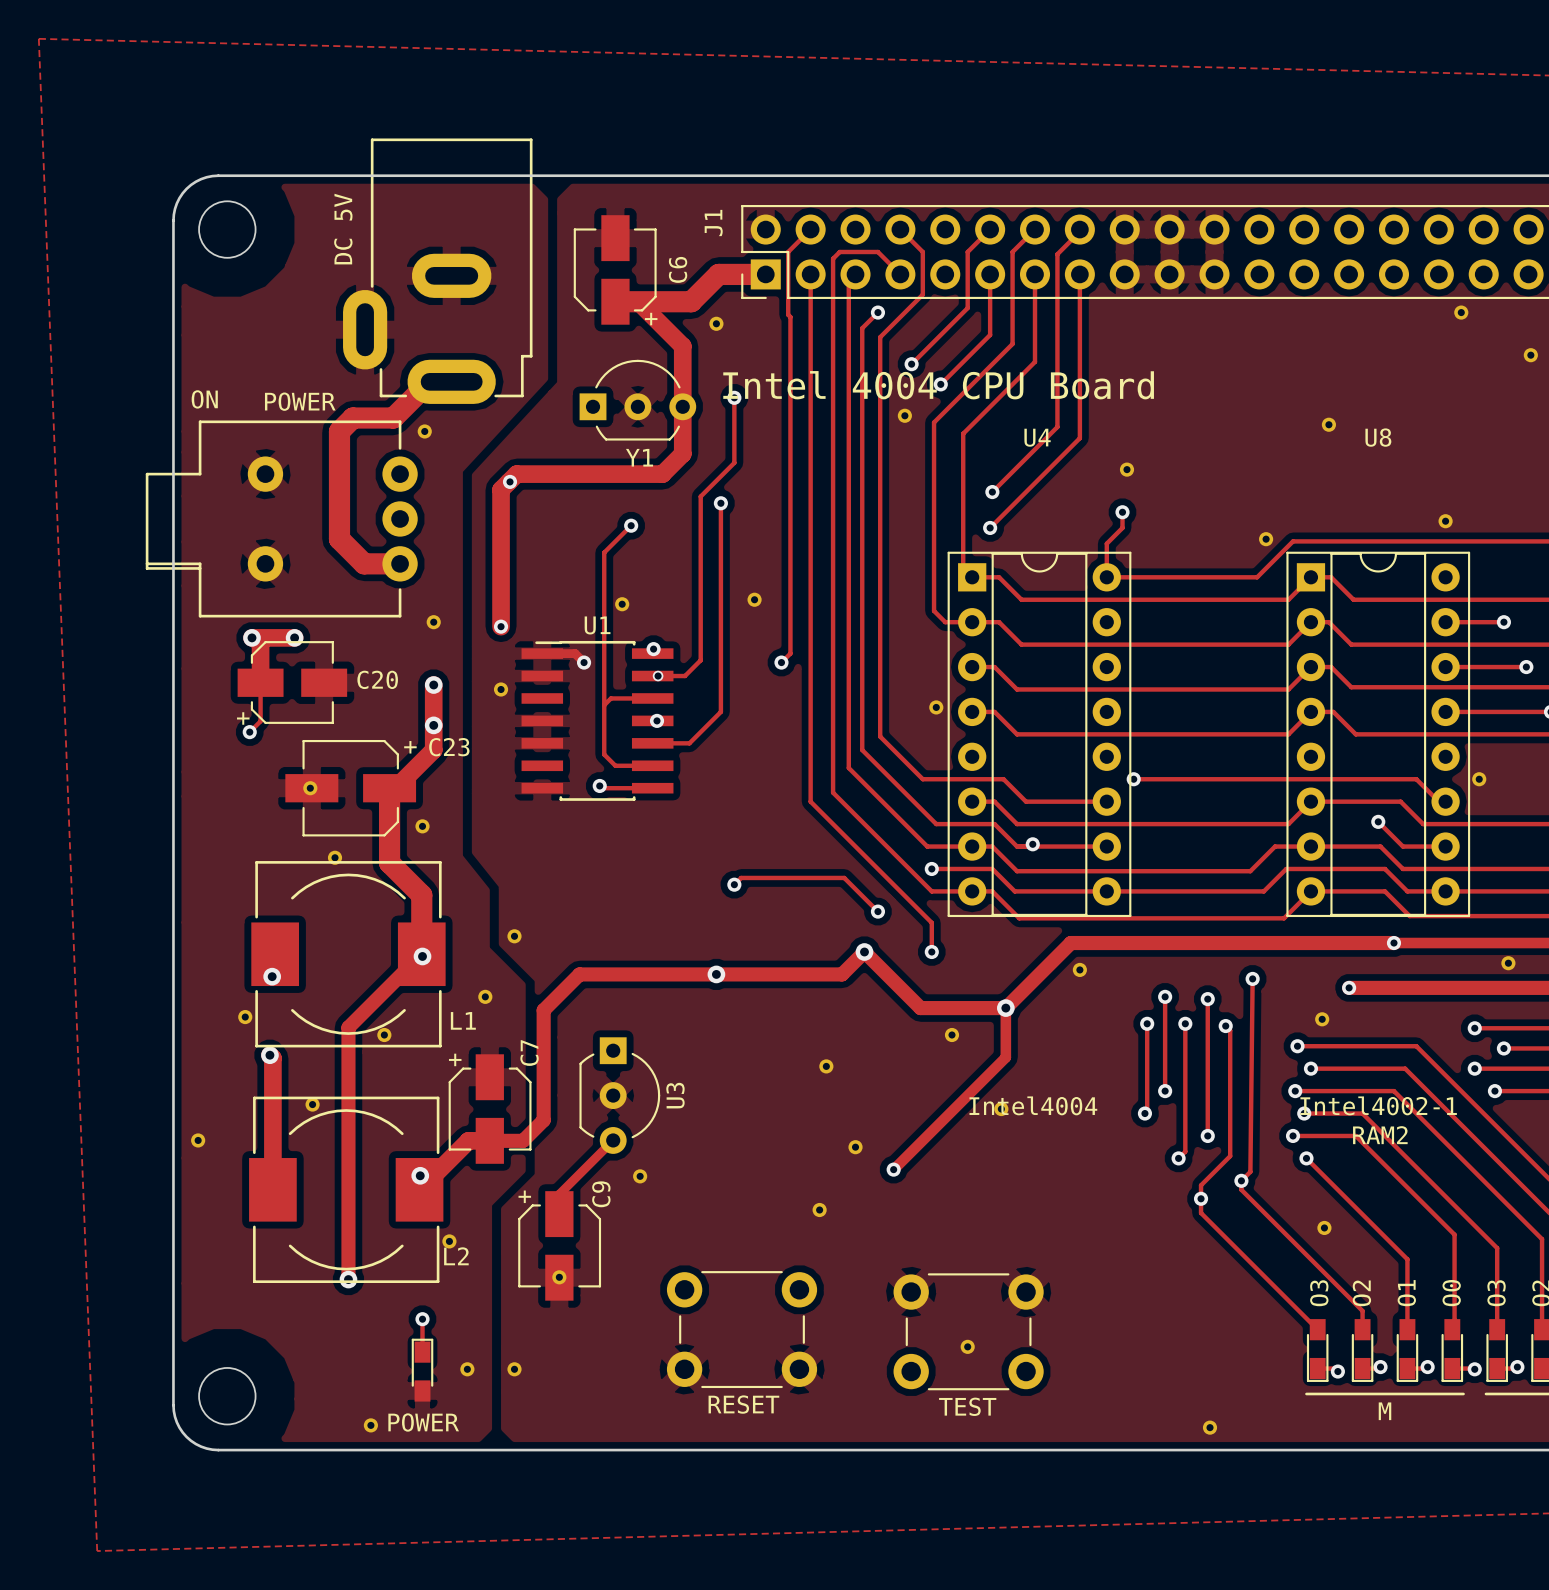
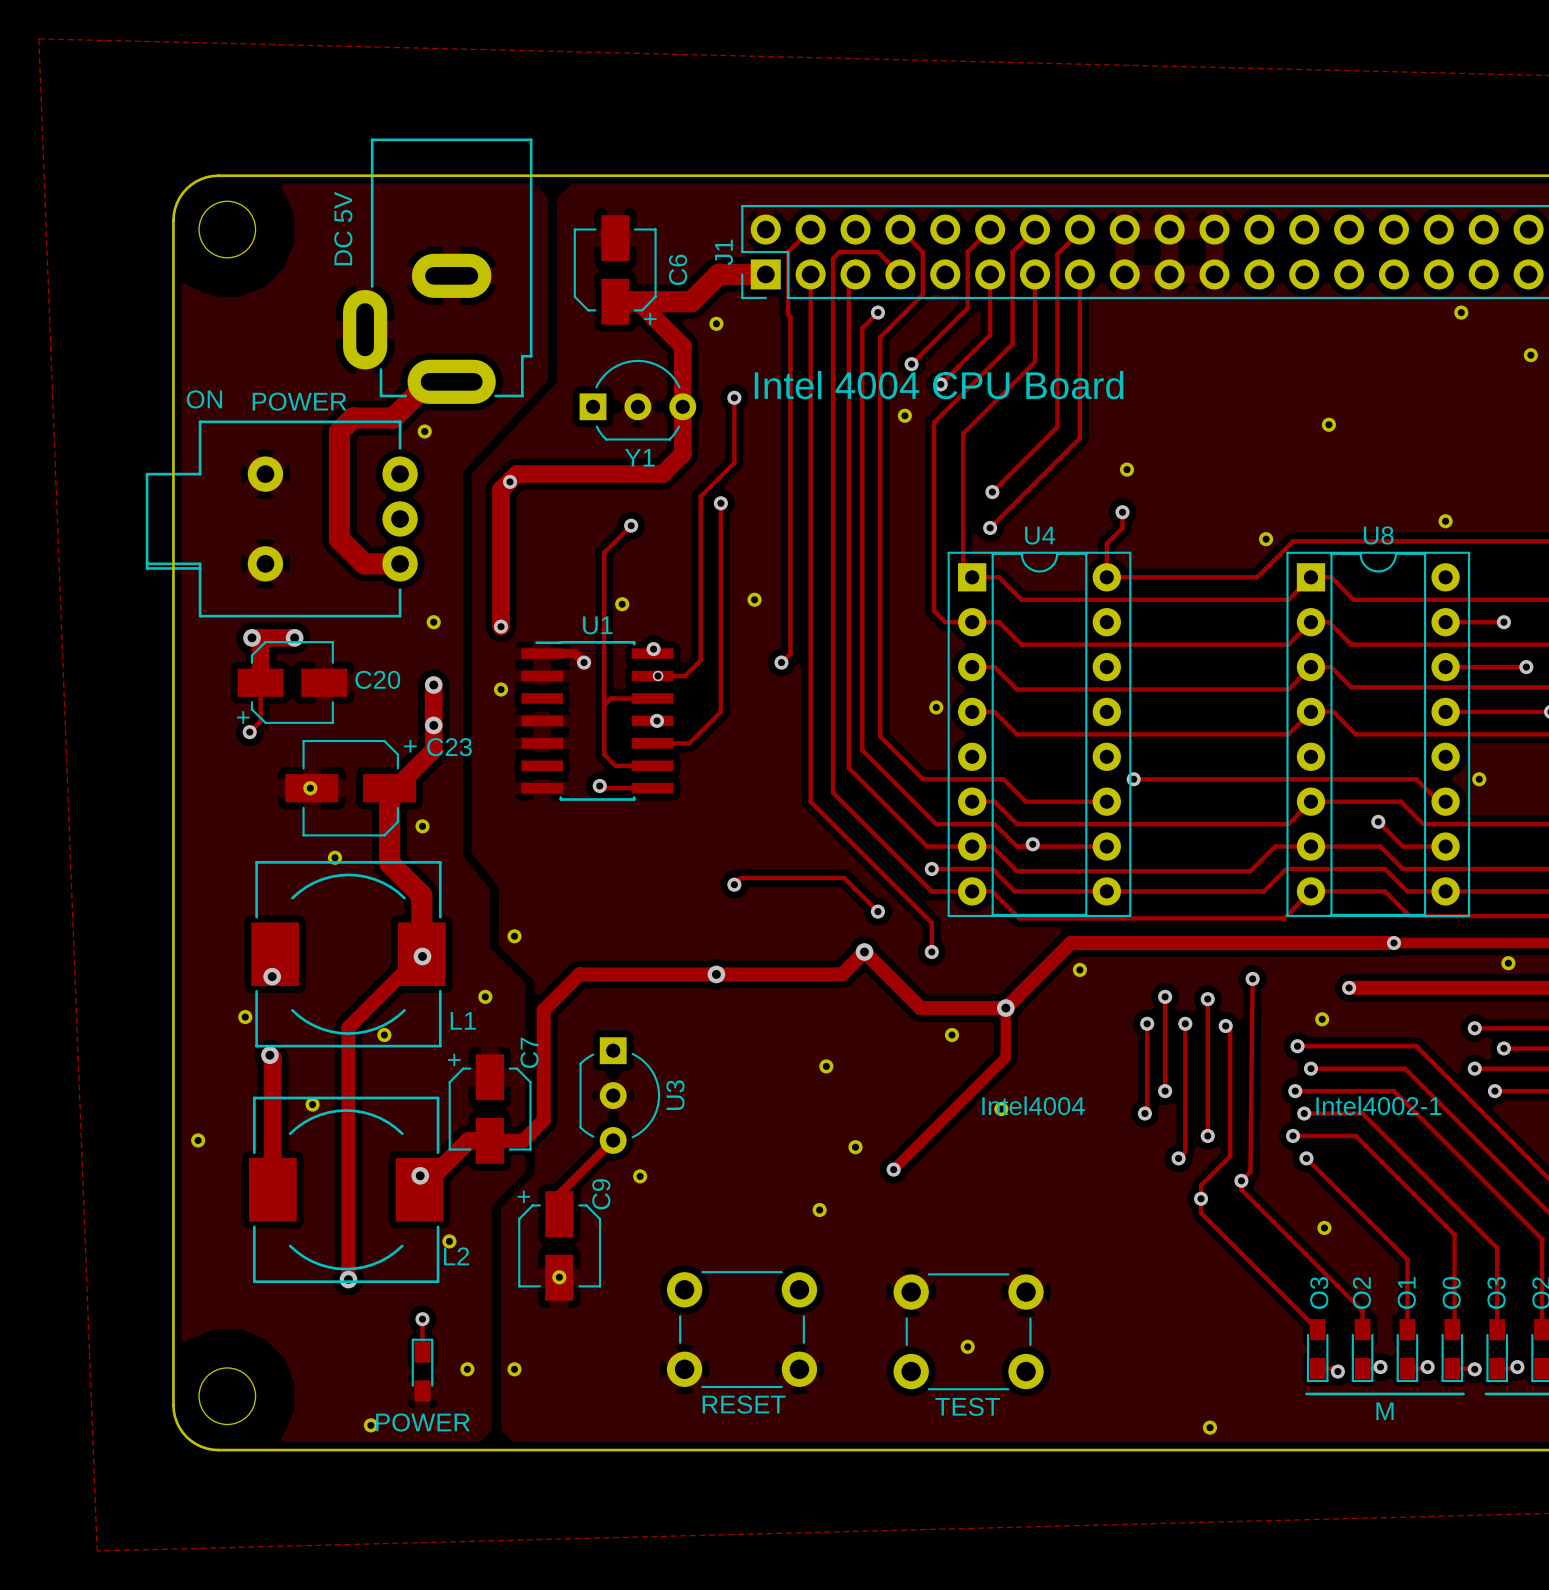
J1 name position: J1 (713, 223) -> J1 (724, 252)
U4 name position: U4 (1037, 437) -> U4 (1040, 535)
U8 name position: U8 (1378, 437) -> U8 (1378, 535)
text: RAM2 (1380, 1135) -> none

